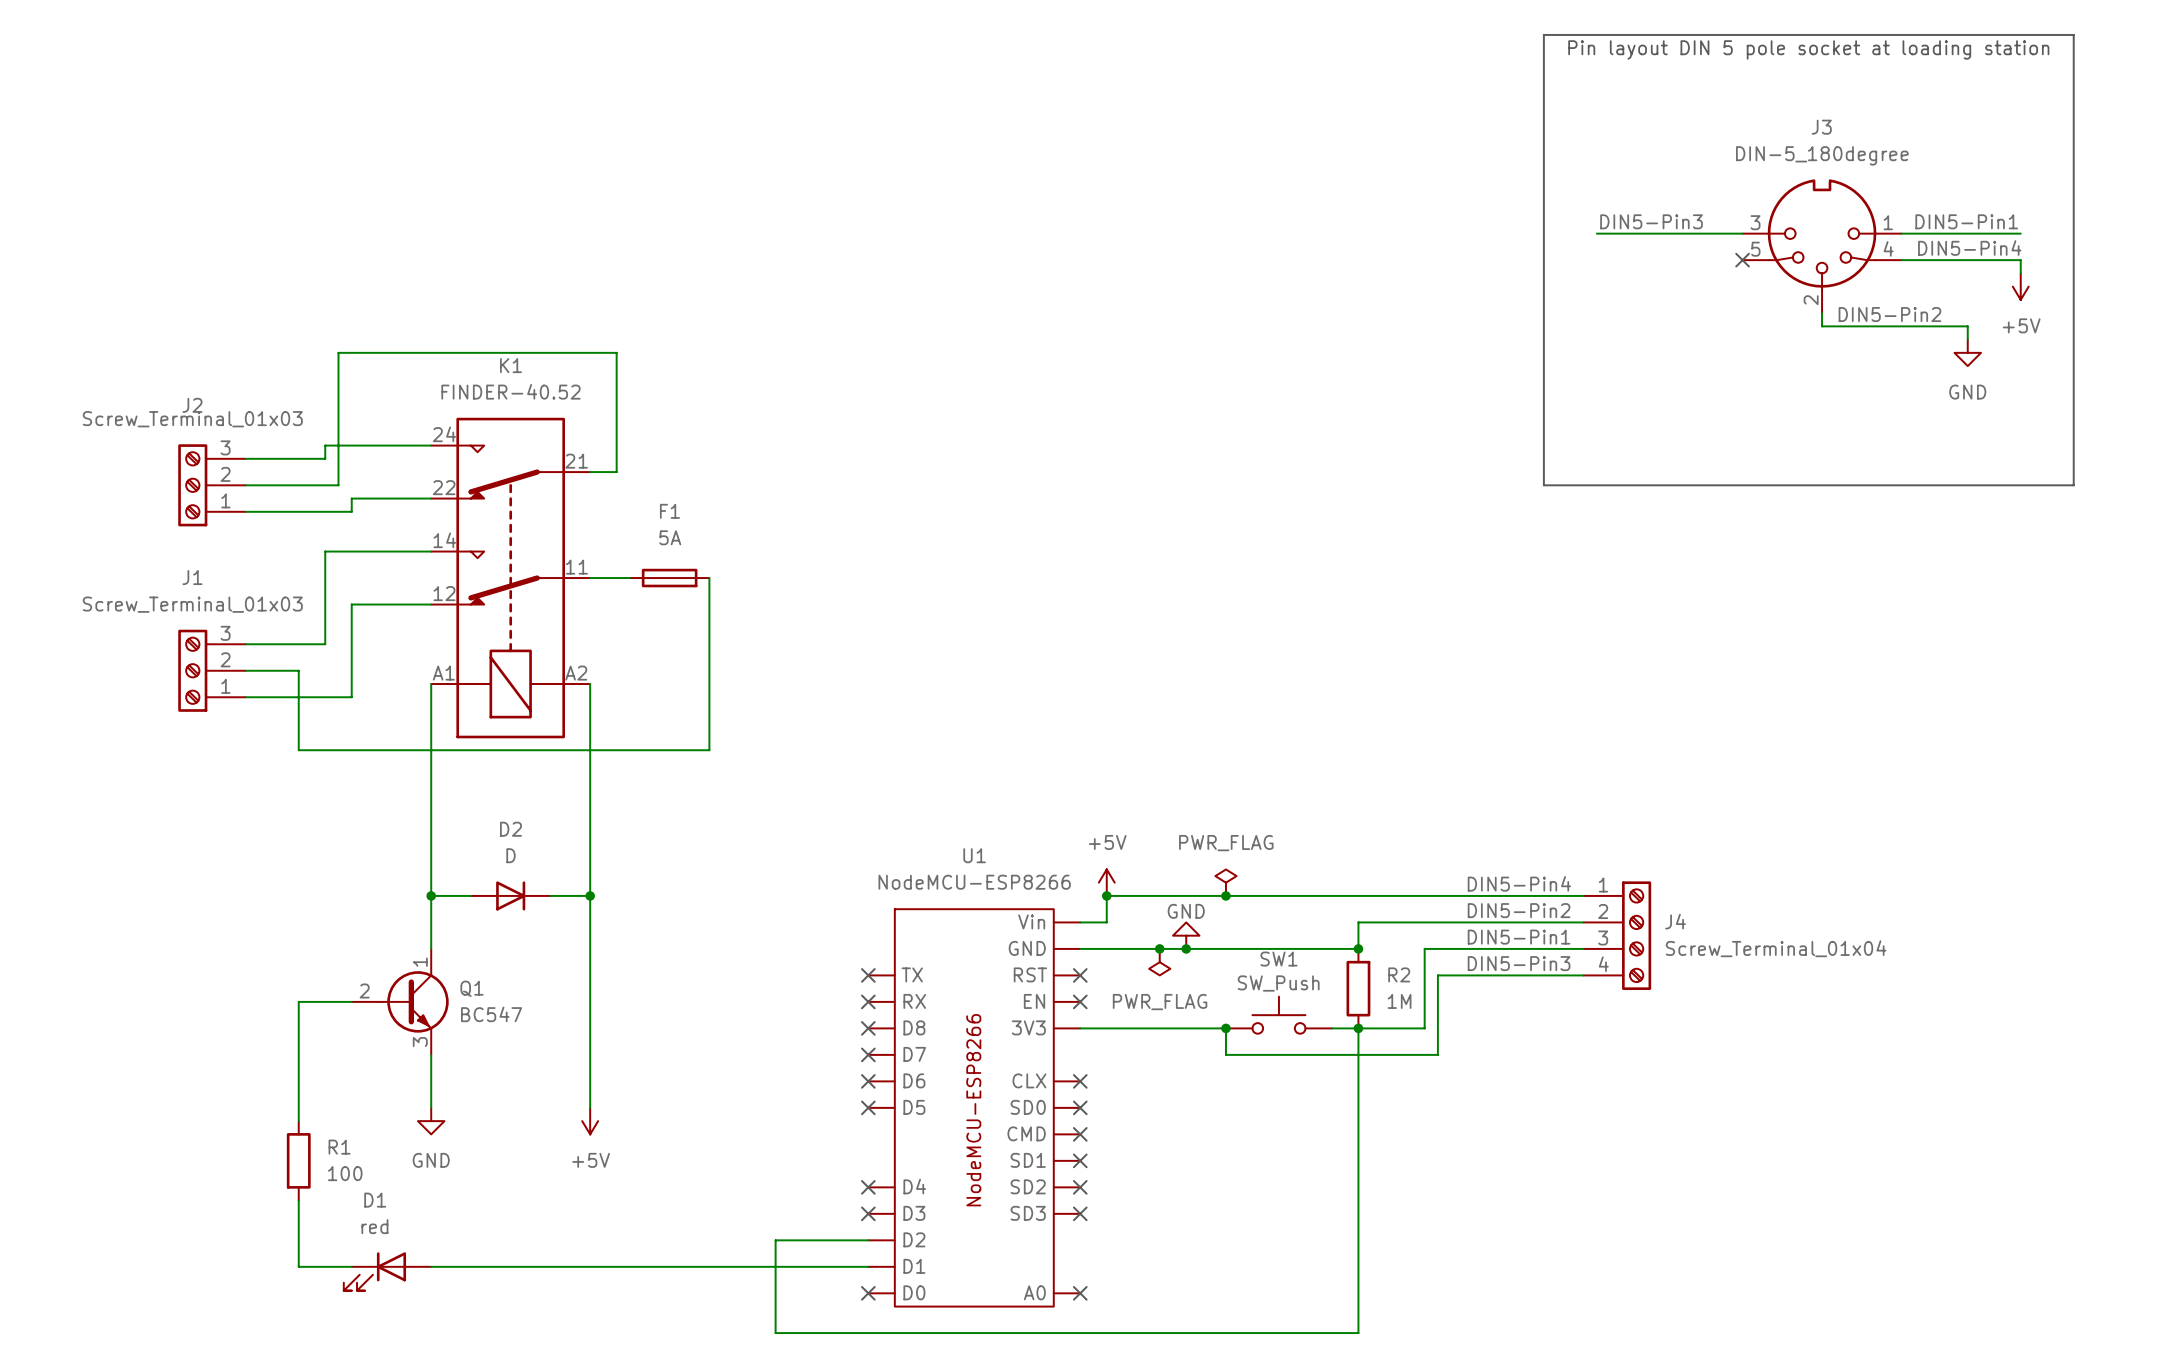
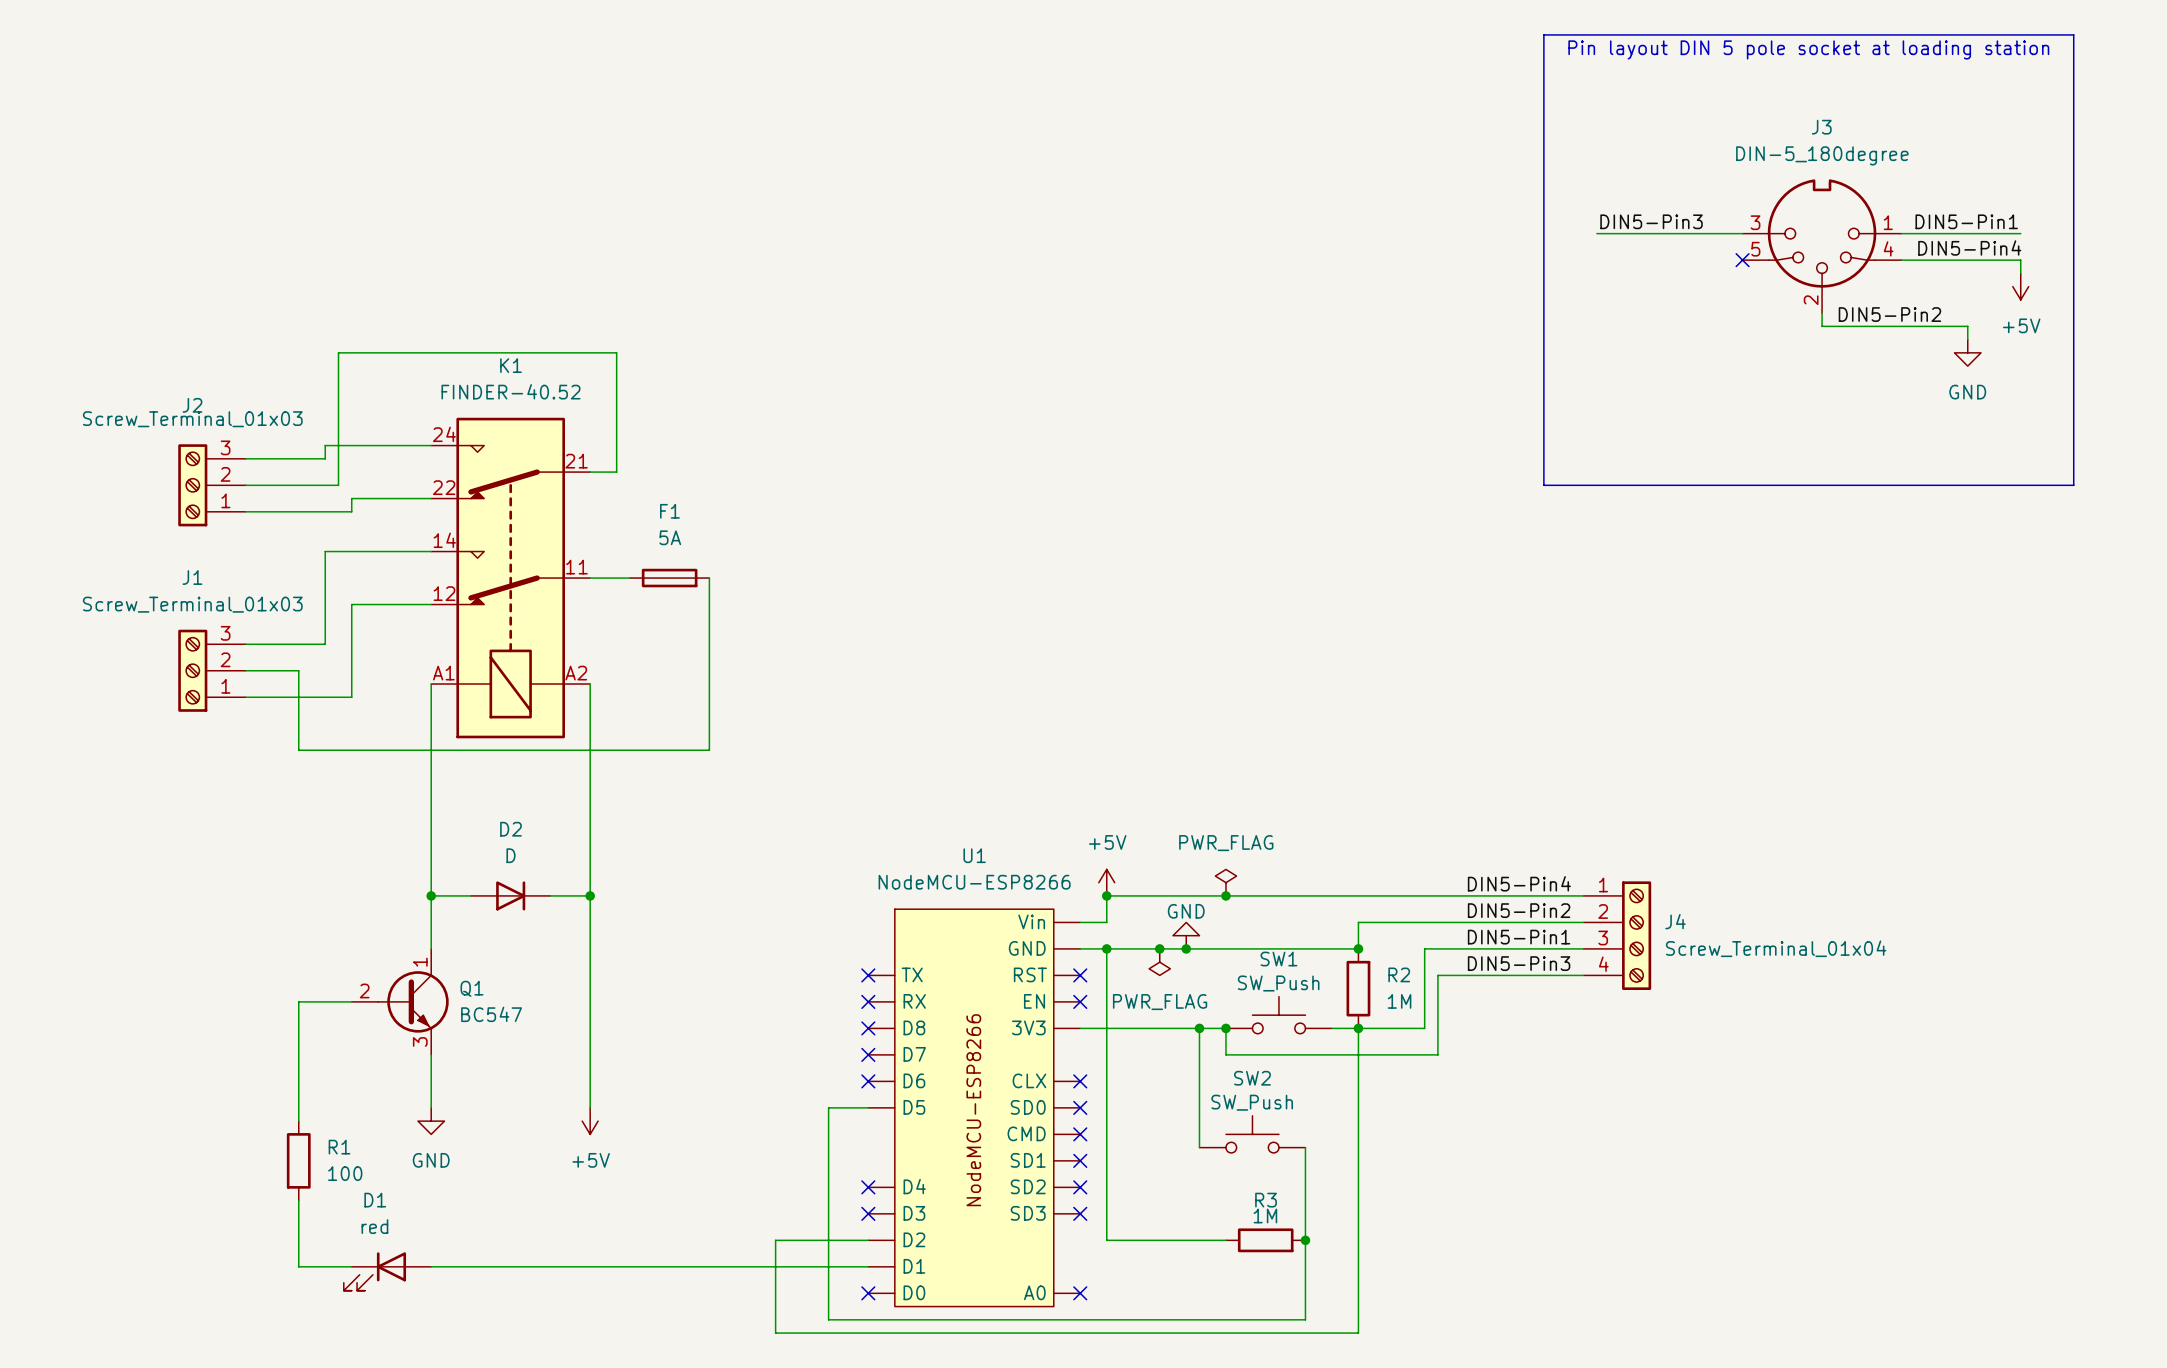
wire: none -> (1106, 948) (1106, 1240) (1225, 1240)
junction: none -> (1106, 948)
wire: none -> (1199, 1028) (1199, 1147)
junction: none -> (1199, 1028)
wire: none -> (868, 1107) (828, 1107) (828, 1319) (1305, 1319) (1305, 1147)
no-connect mark: (868, 1107) -> none
SW2: none -> SW_Push (1252, 1134)
R3: none -> 1M (1265, 1240)
junction: none -> (1305, 1240)

